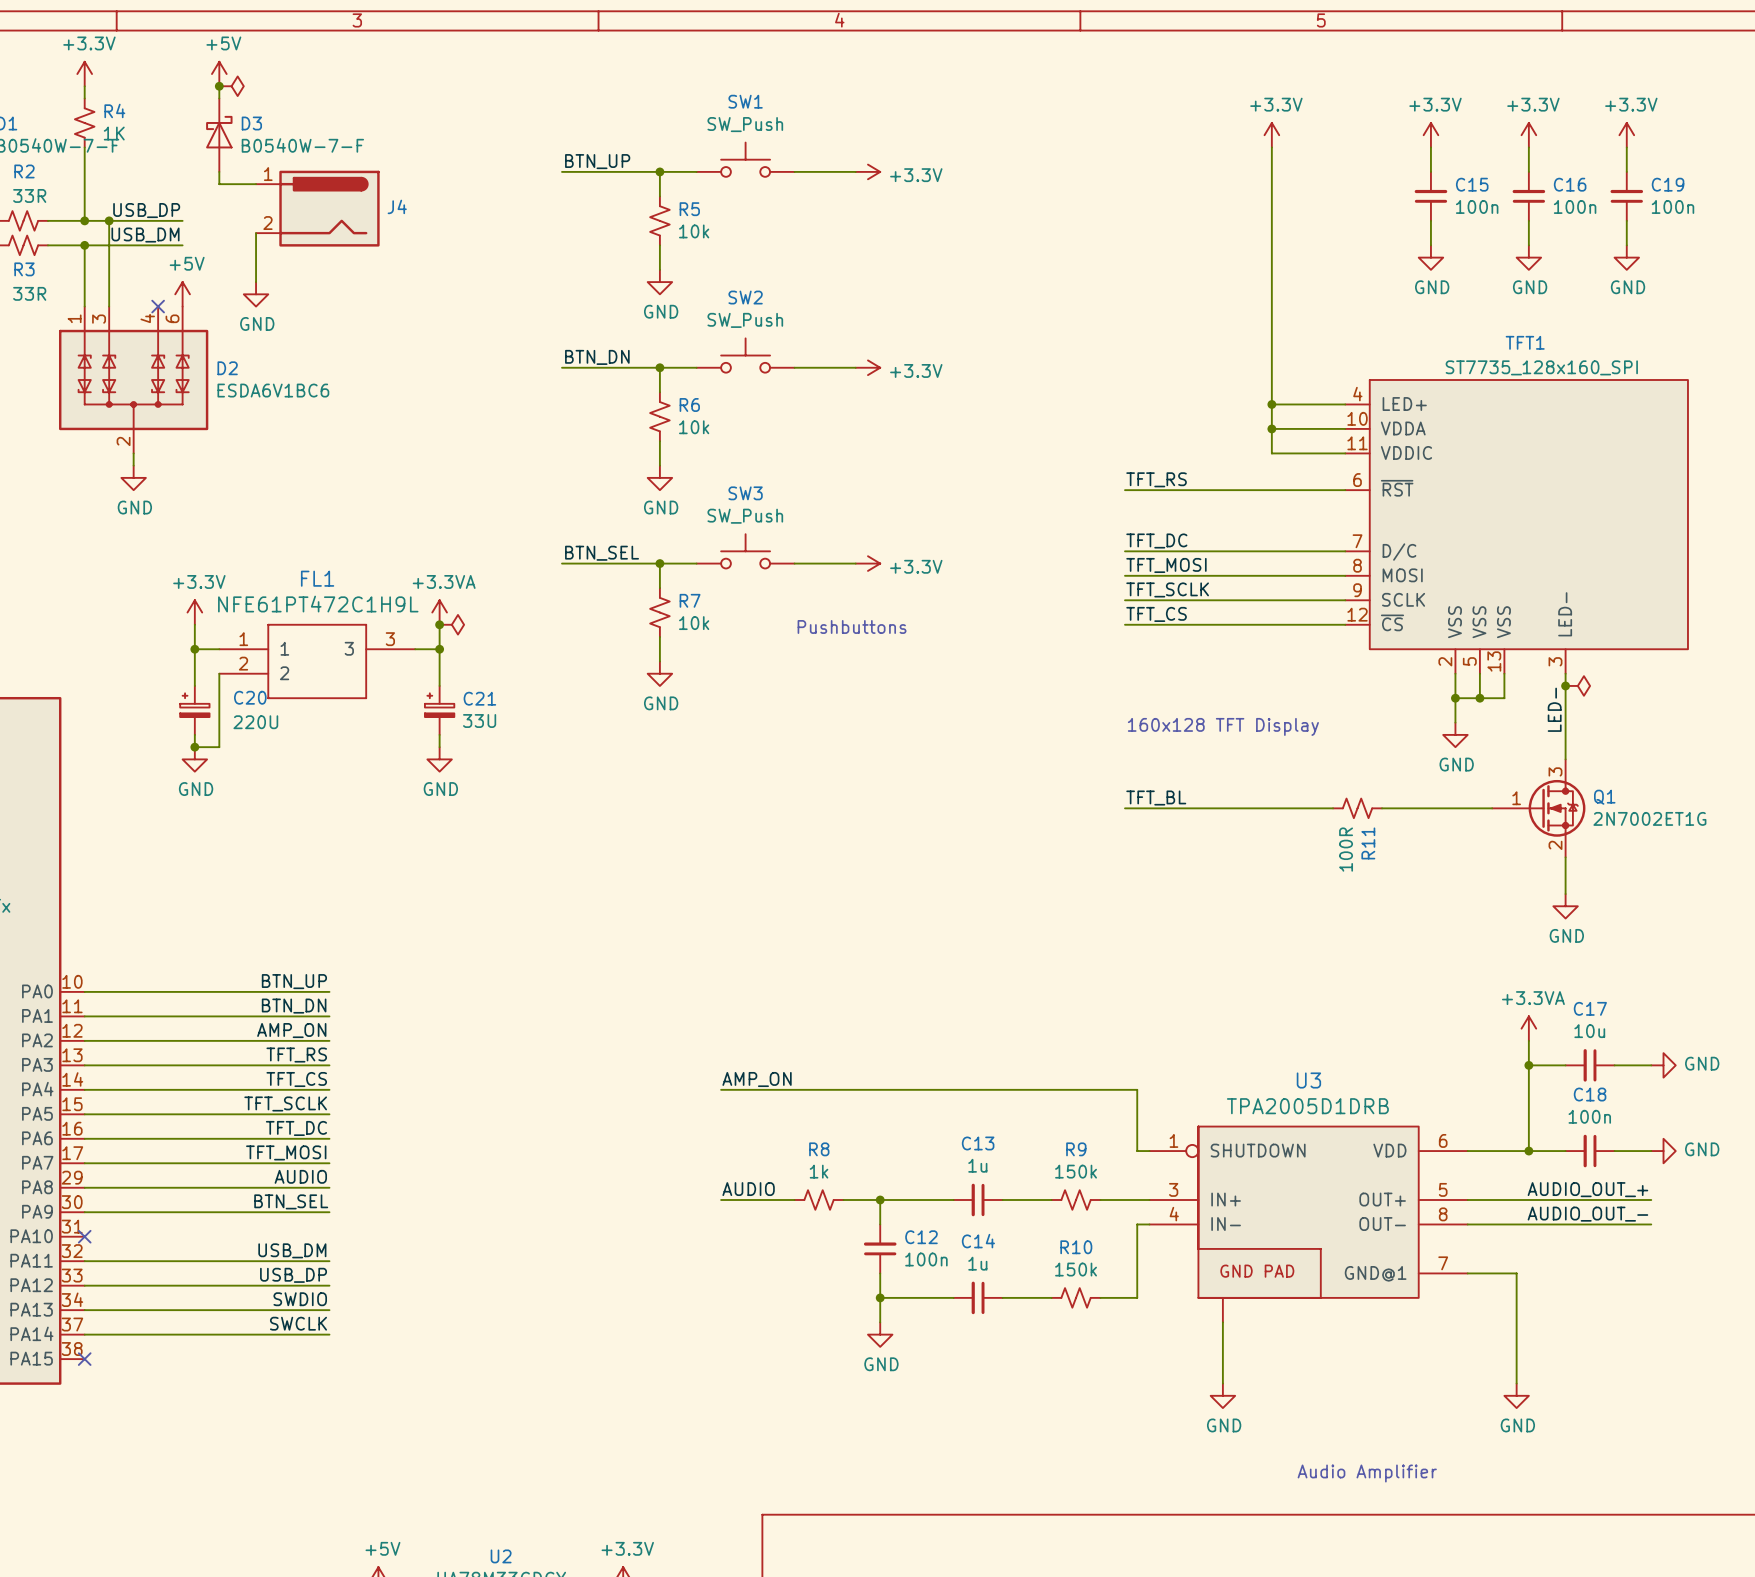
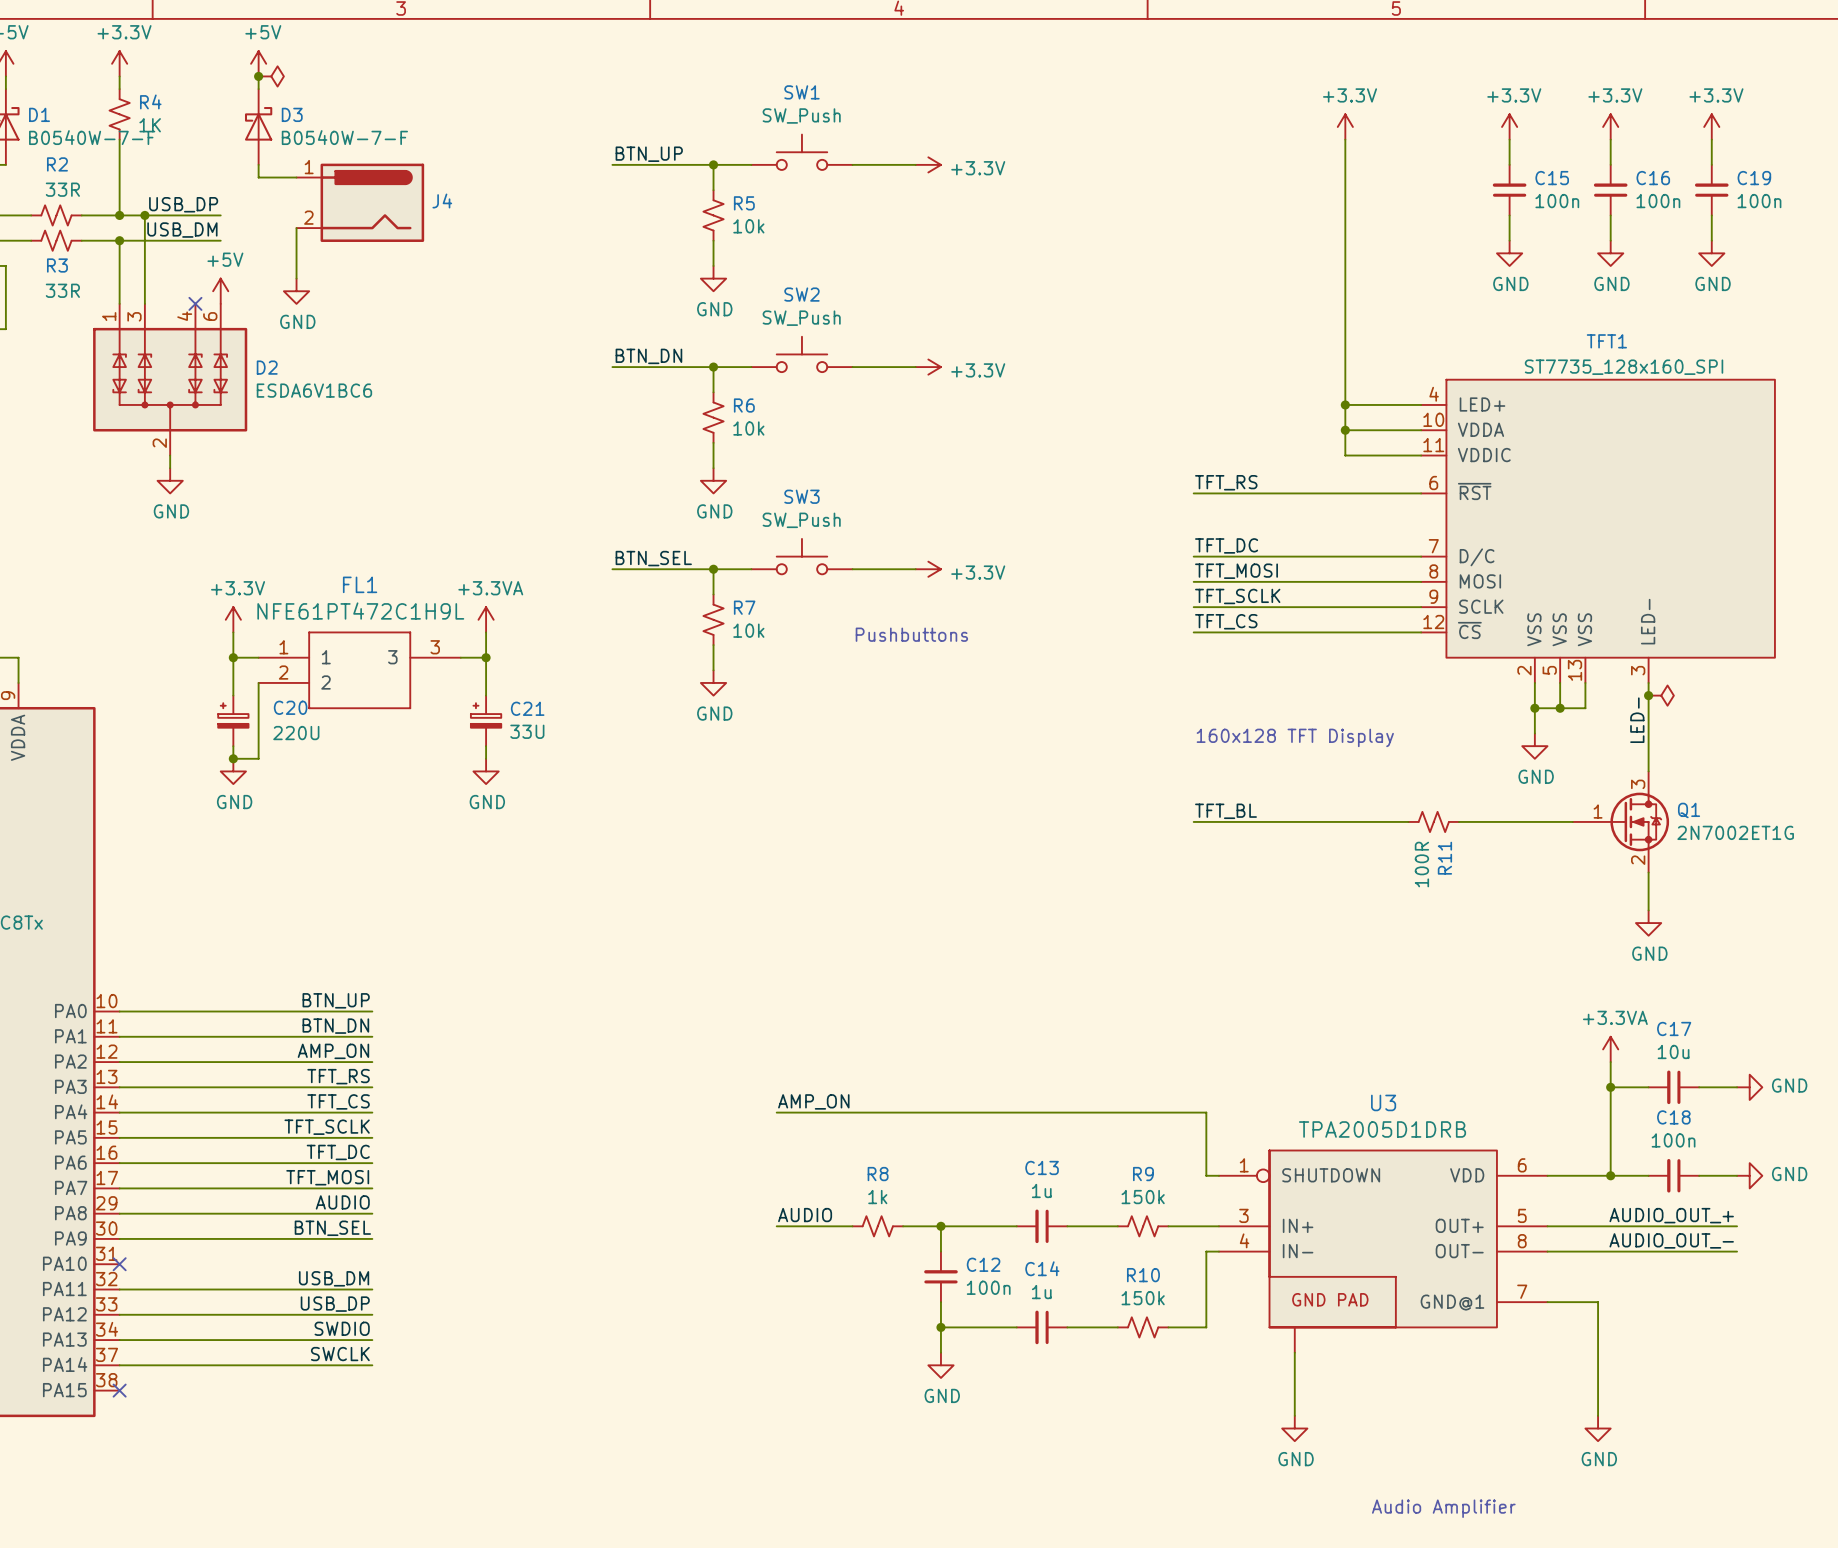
junction: (439, 624) -> none
power symbol: (451, 624) -> none

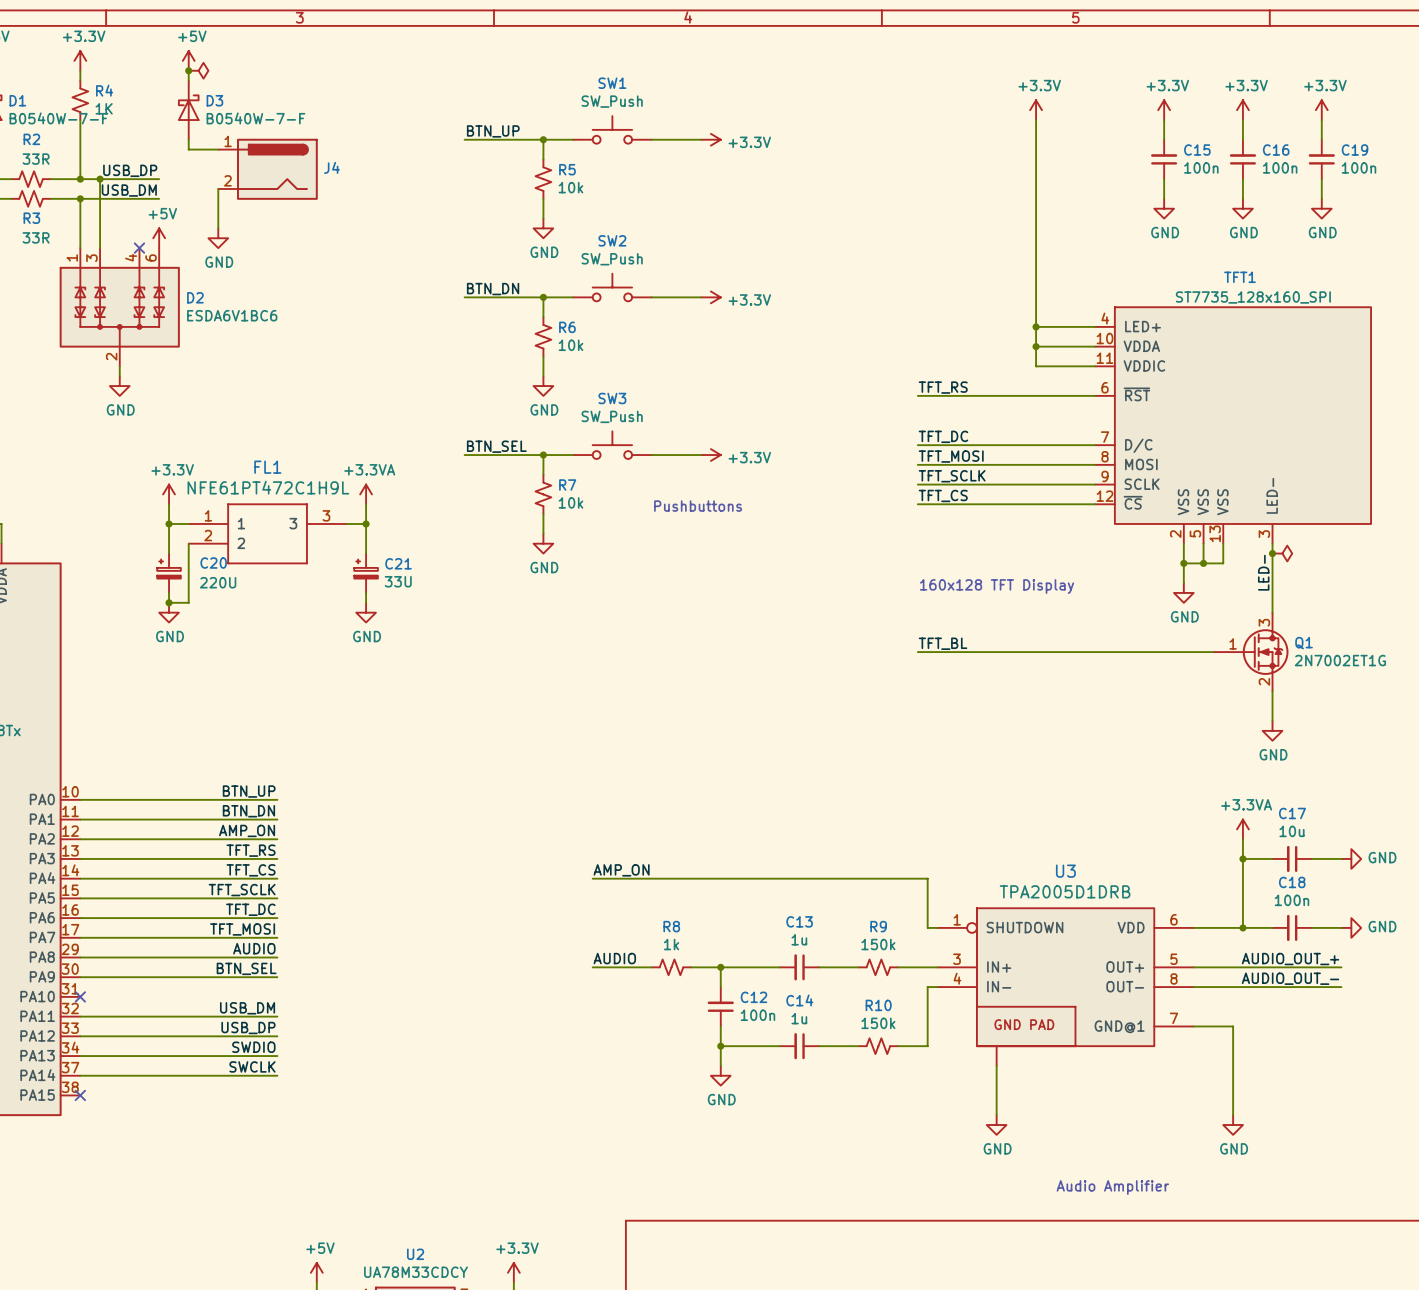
R11: 100R (1433, 821) -> none

